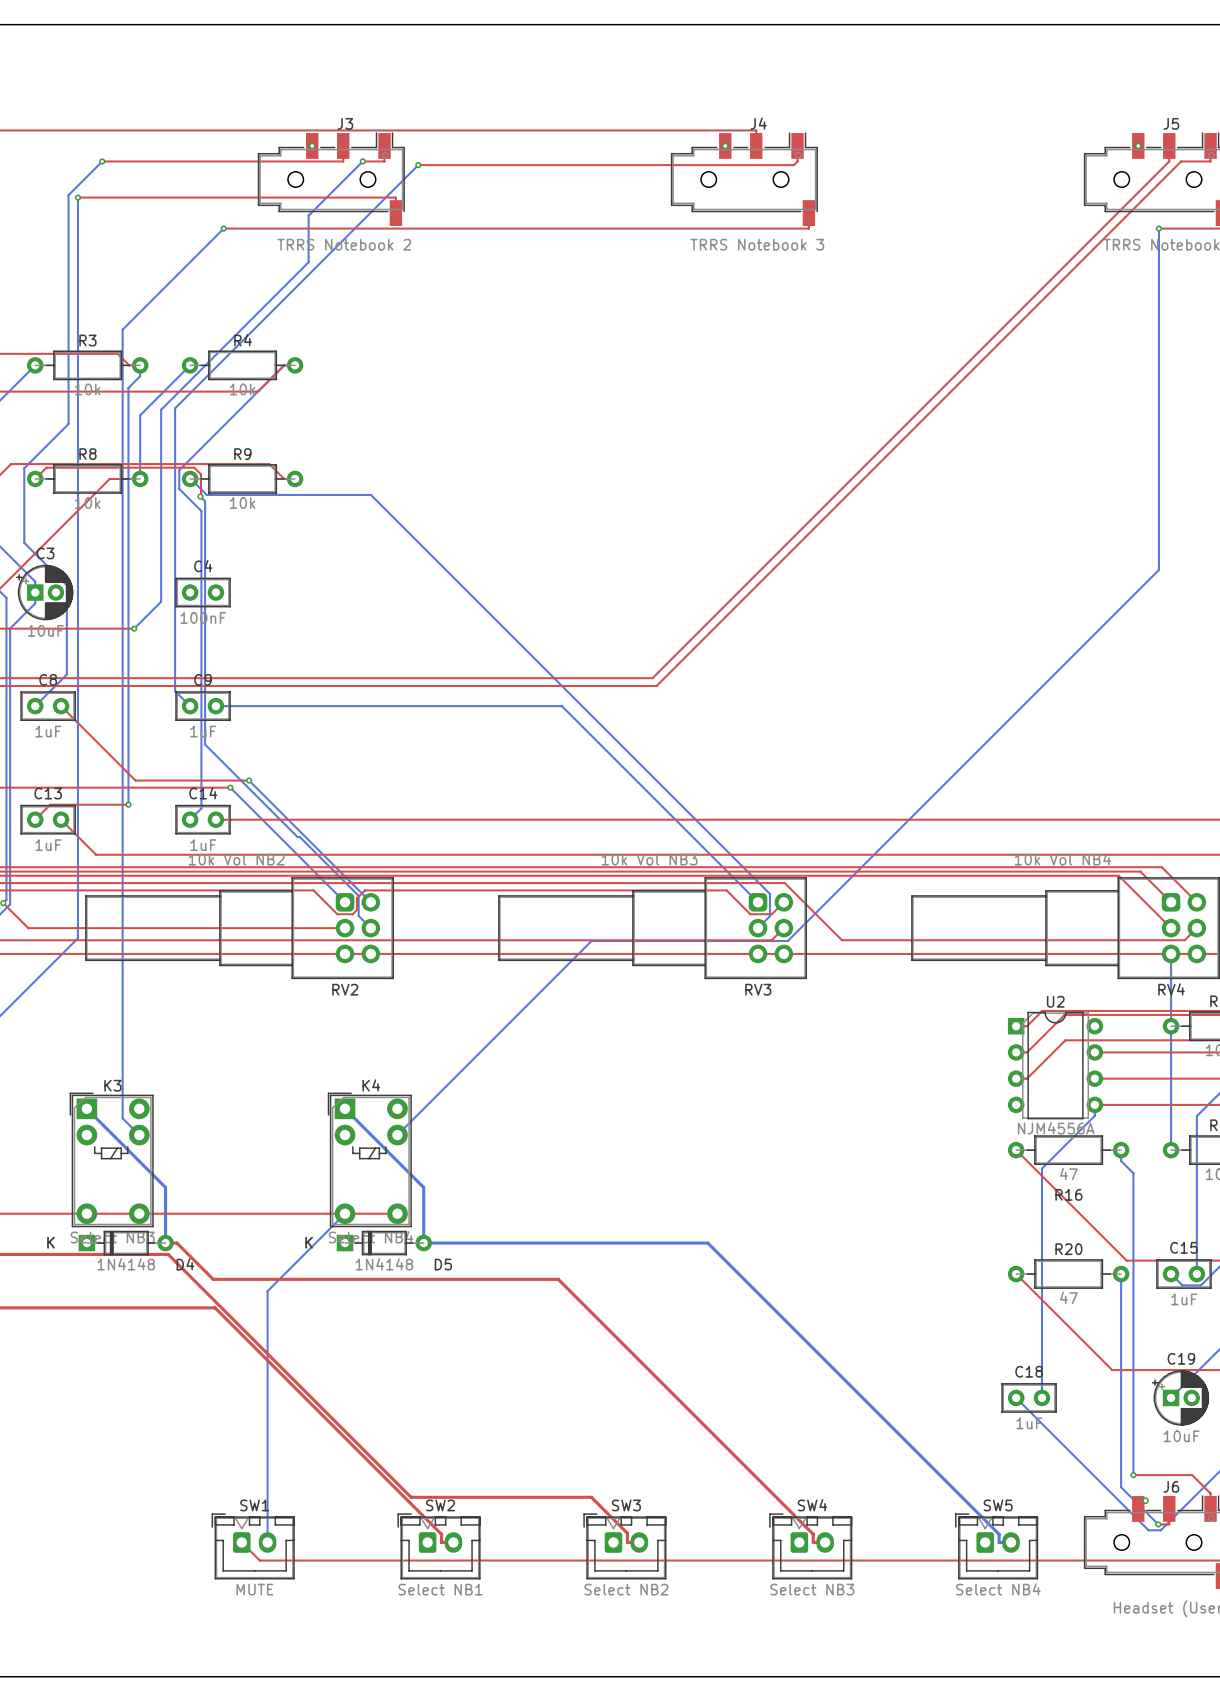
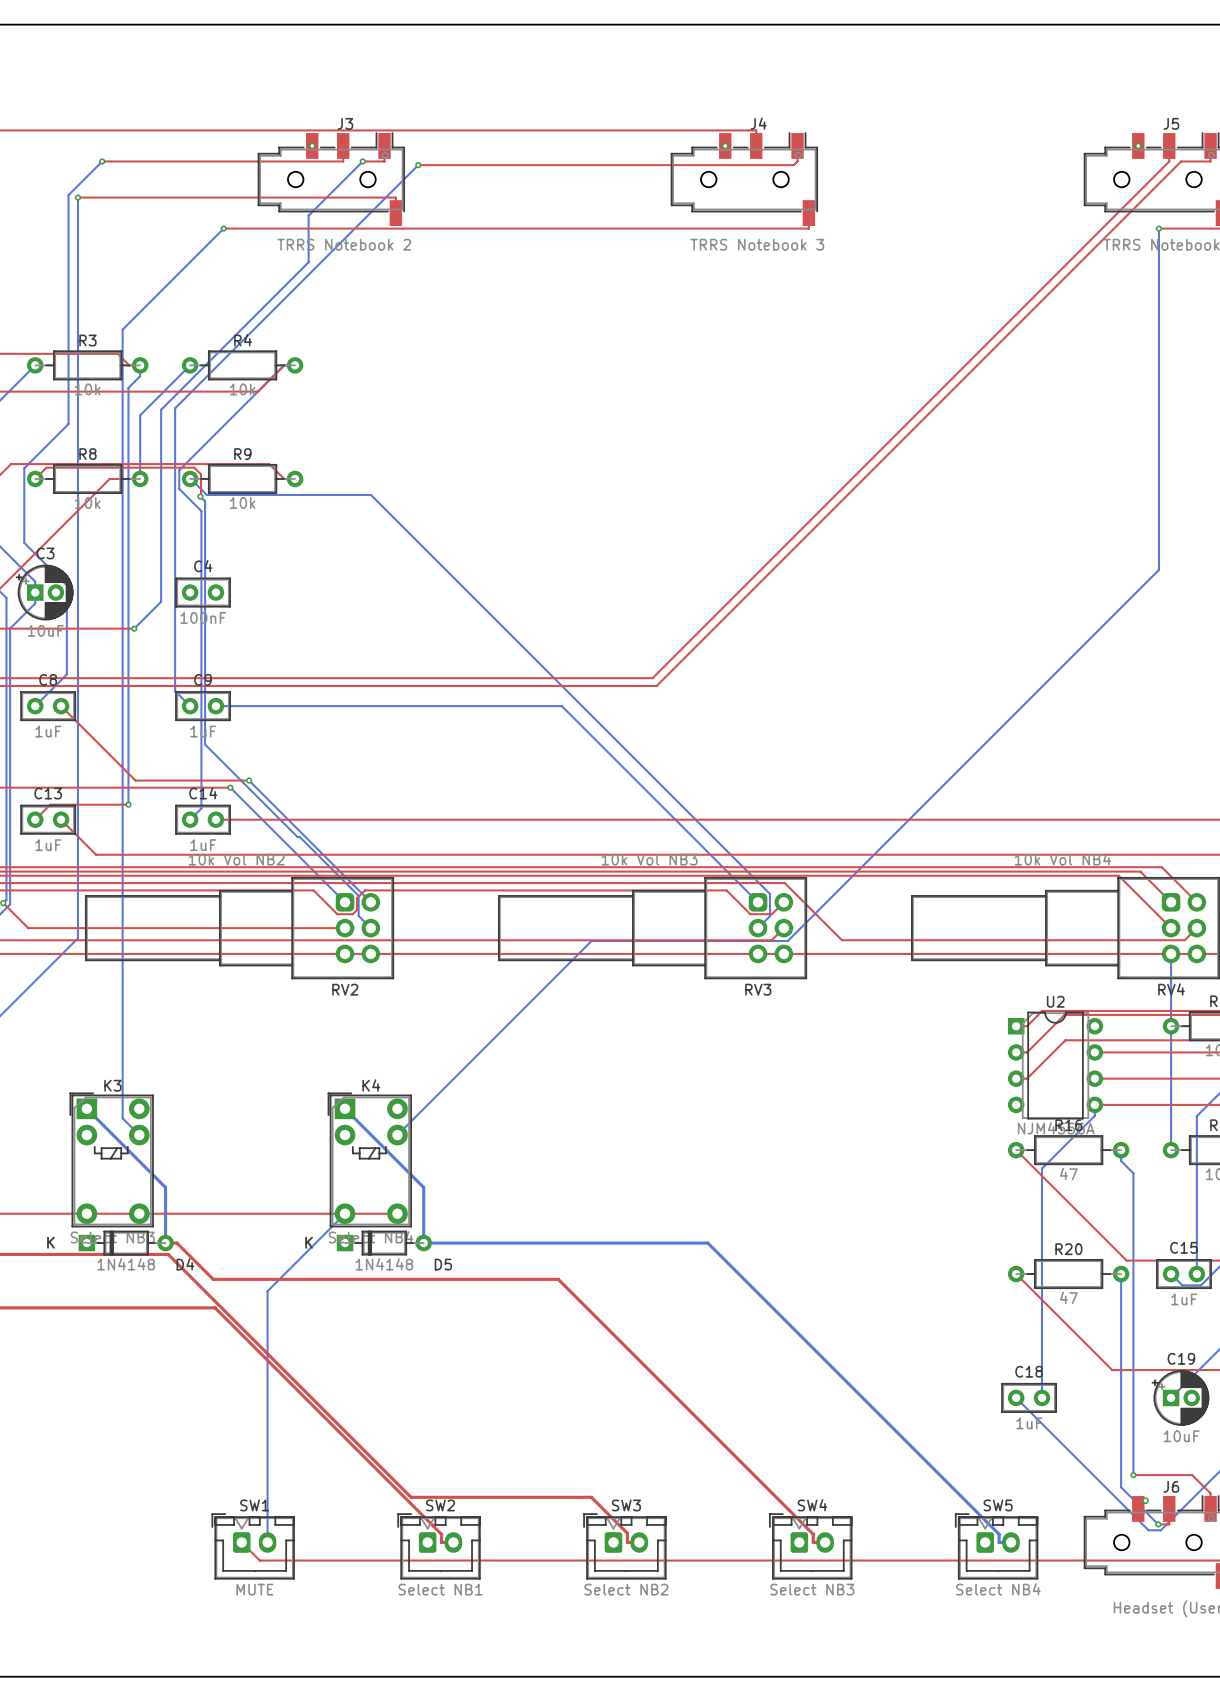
R16 name position: R16 (1068, 1194) -> R16 (1068, 1125)

